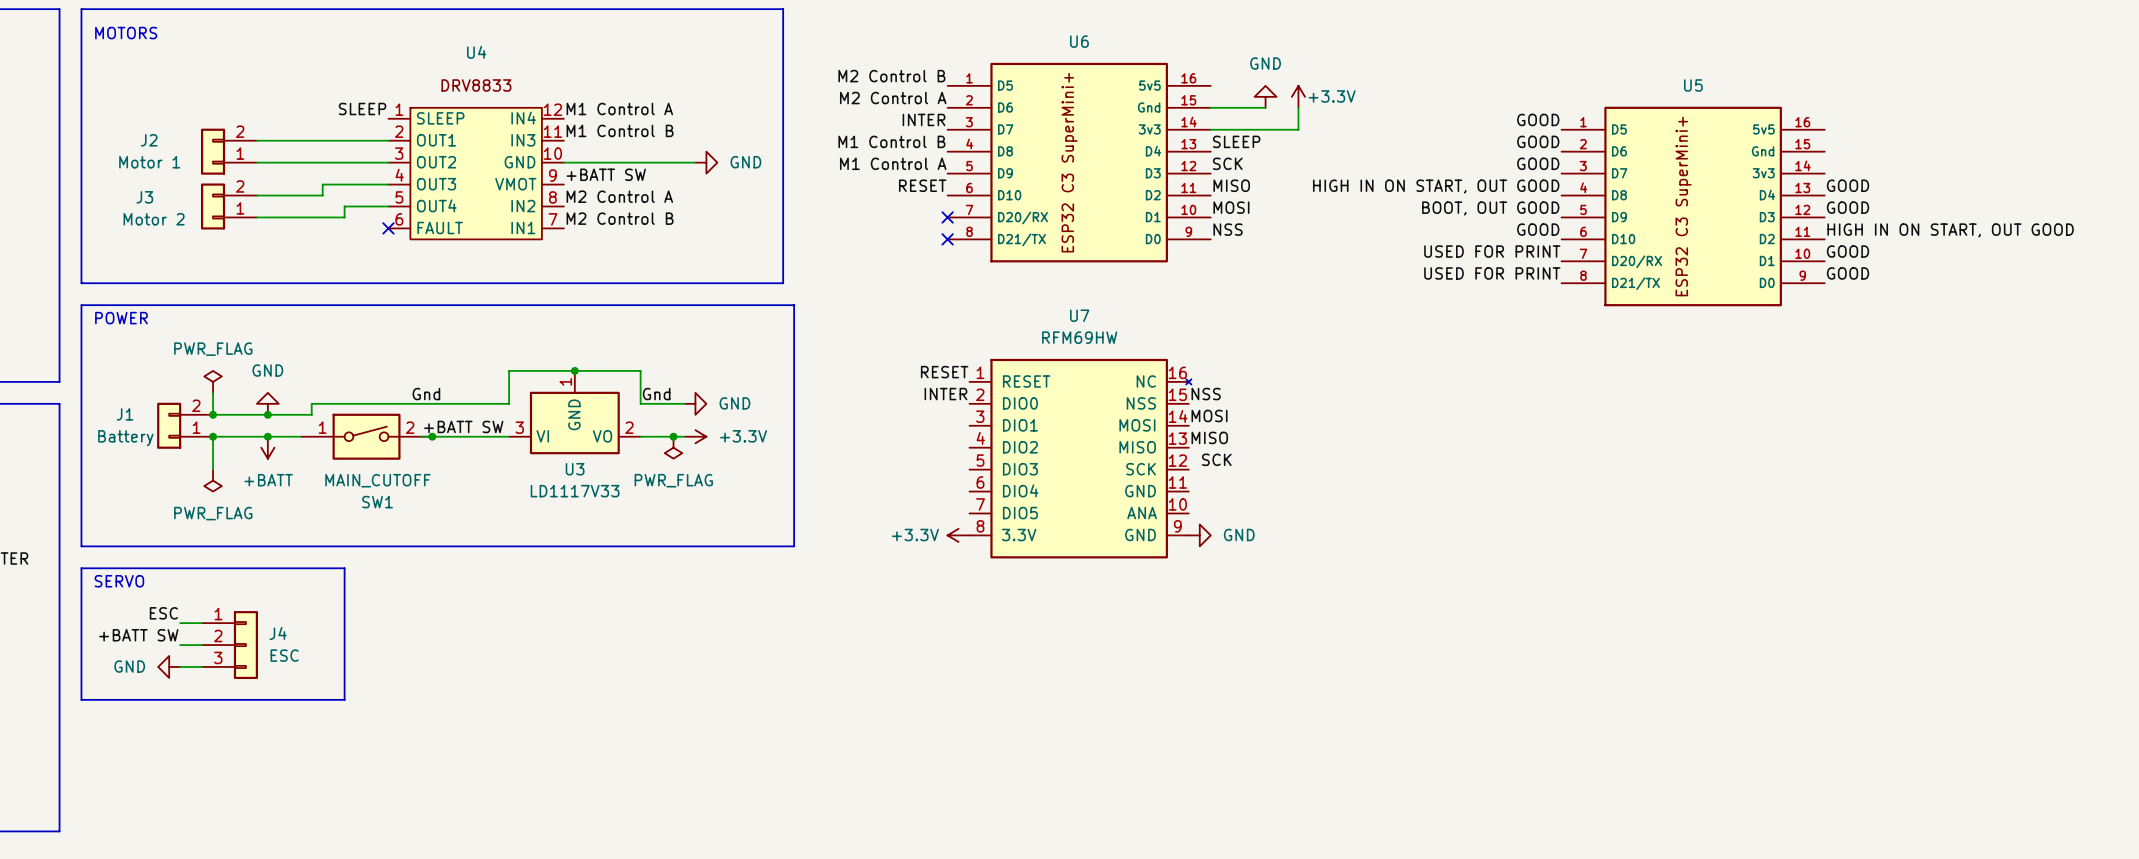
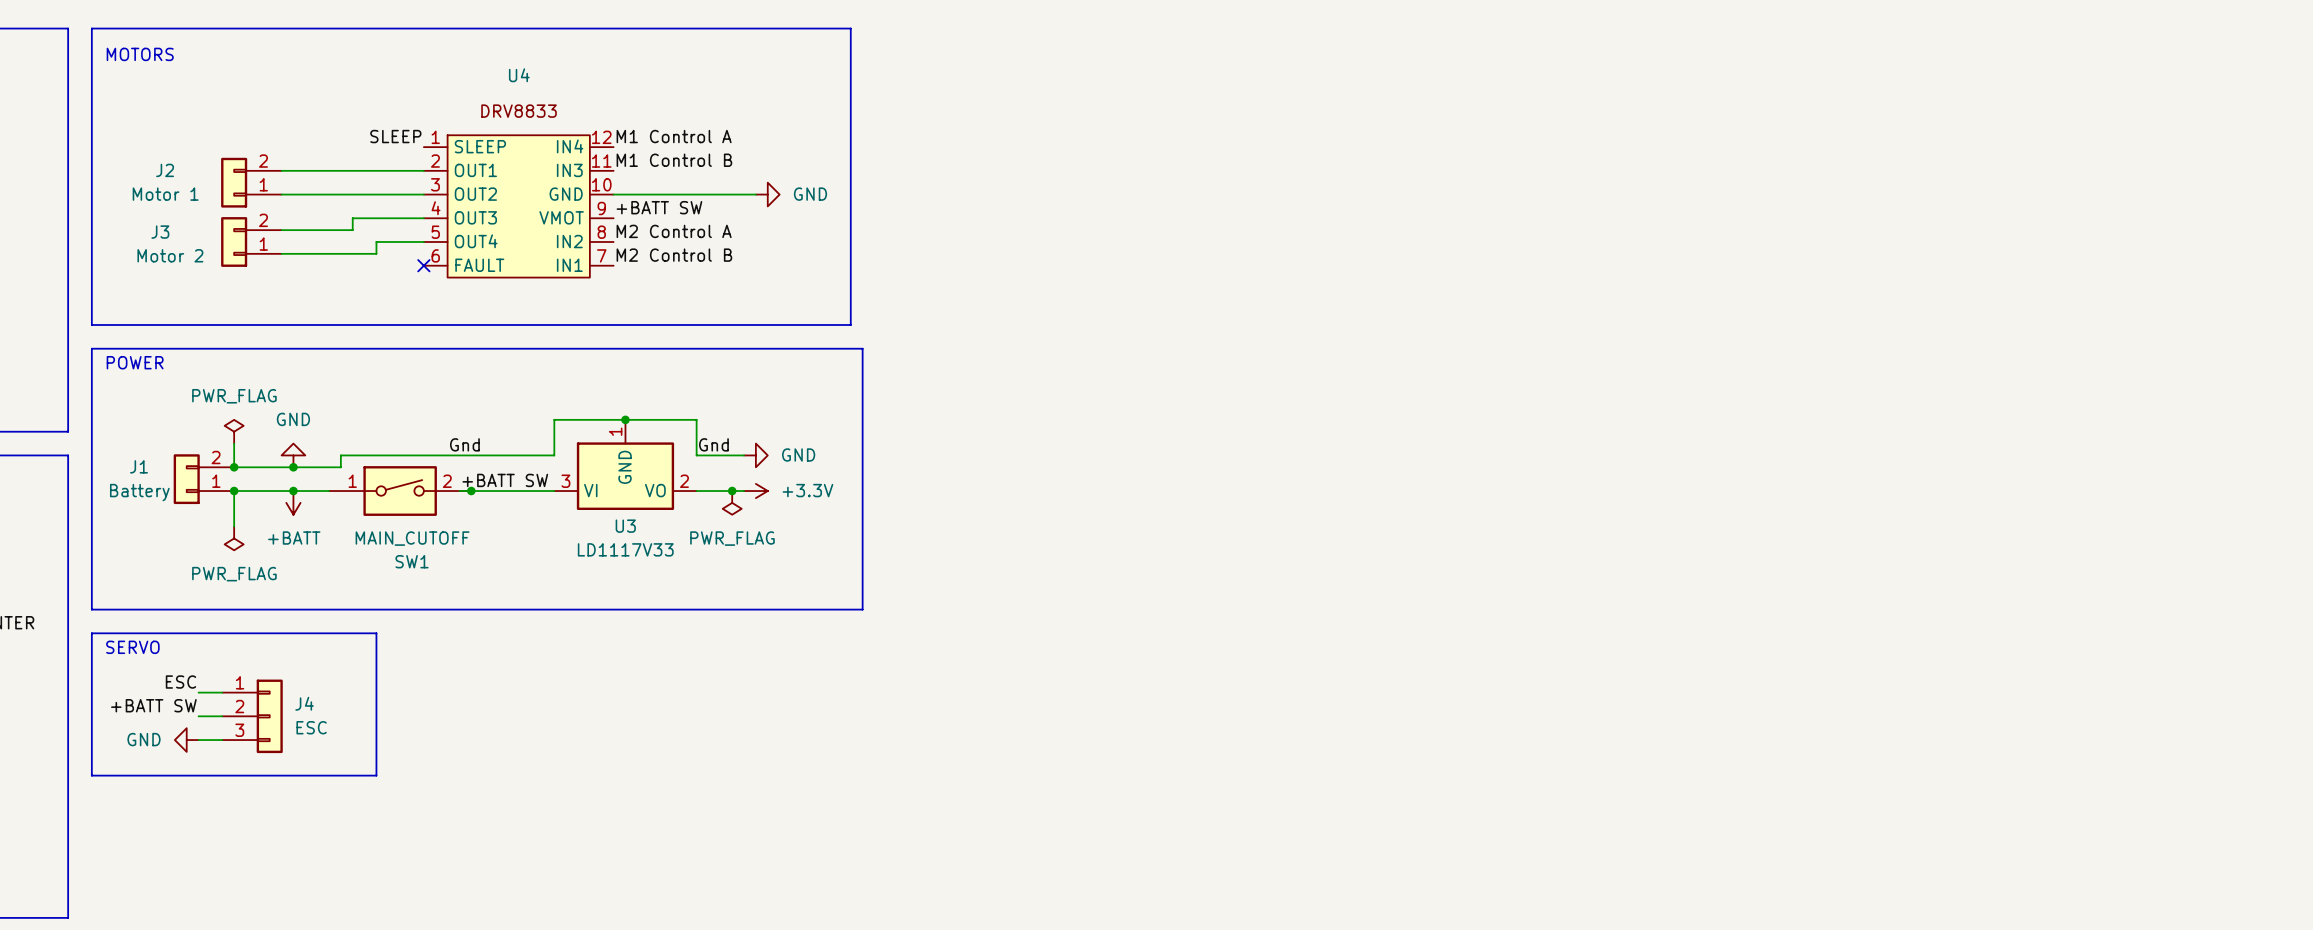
label: M2 Control B (891, 76) -> none
power symbol: GND (1265, 96) -> none
power symbol: +3.3V (1298, 96) -> none
label: M2 Control A (893, 98) -> none
wire: (1210, 107) (1265, 107) -> none
wire: (1298, 107) (1298, 129) (1210, 129) -> none
label: INTER (924, 119) -> none
label: GOOD (1538, 119) -> none
label: M1 Control B (891, 141) -> none
label: SLEEP (1236, 141) -> none
label: GOOD (1538, 141) -> none
U6: (1079, 162) -> none
label: M1 Control A (893, 163) -> none
label: SCK (1227, 163) -> none
label: GOOD (1538, 163) -> none
label: RESET (922, 185) -> none
label: MISO (1231, 185) -> none
label: GOOD (1848, 185) -> none
label: HIGH IN ON START, OUT GOOD (1436, 186) -> none
U5: (1693, 206) -> none
label: MOSI (1231, 207) -> none
label: GOOD (1848, 207) -> none
label: BOOT, OUT GOOD (1490, 208) -> none
no-connect mark: (947, 217) -> none
label: NSS (1228, 229) -> none
label: GOOD (1538, 229) -> none
label: HIGH IN ON START, OUT GOOD (1950, 230) -> none
no-connect mark: (947, 239) -> none
label: USED FOR PRINT (1492, 251) -> none
label: GOOD (1848, 251) -> none
label: USED FOR PRINT (1492, 273) -> none
label: GOOD (1848, 273) -> none
label: RESET (944, 372) -> none
label: INTER (945, 394) -> none
label: NSS (1206, 394) -> none
label: MOSI (1209, 415) -> none
label: MISO (1209, 437) -> none
U7: RFM69HW (1080, 458) -> none
label: SCK (1216, 459) -> none
power symbol: +3.3V (958, 535) -> none
power symbol: GND (1199, 535) -> none

